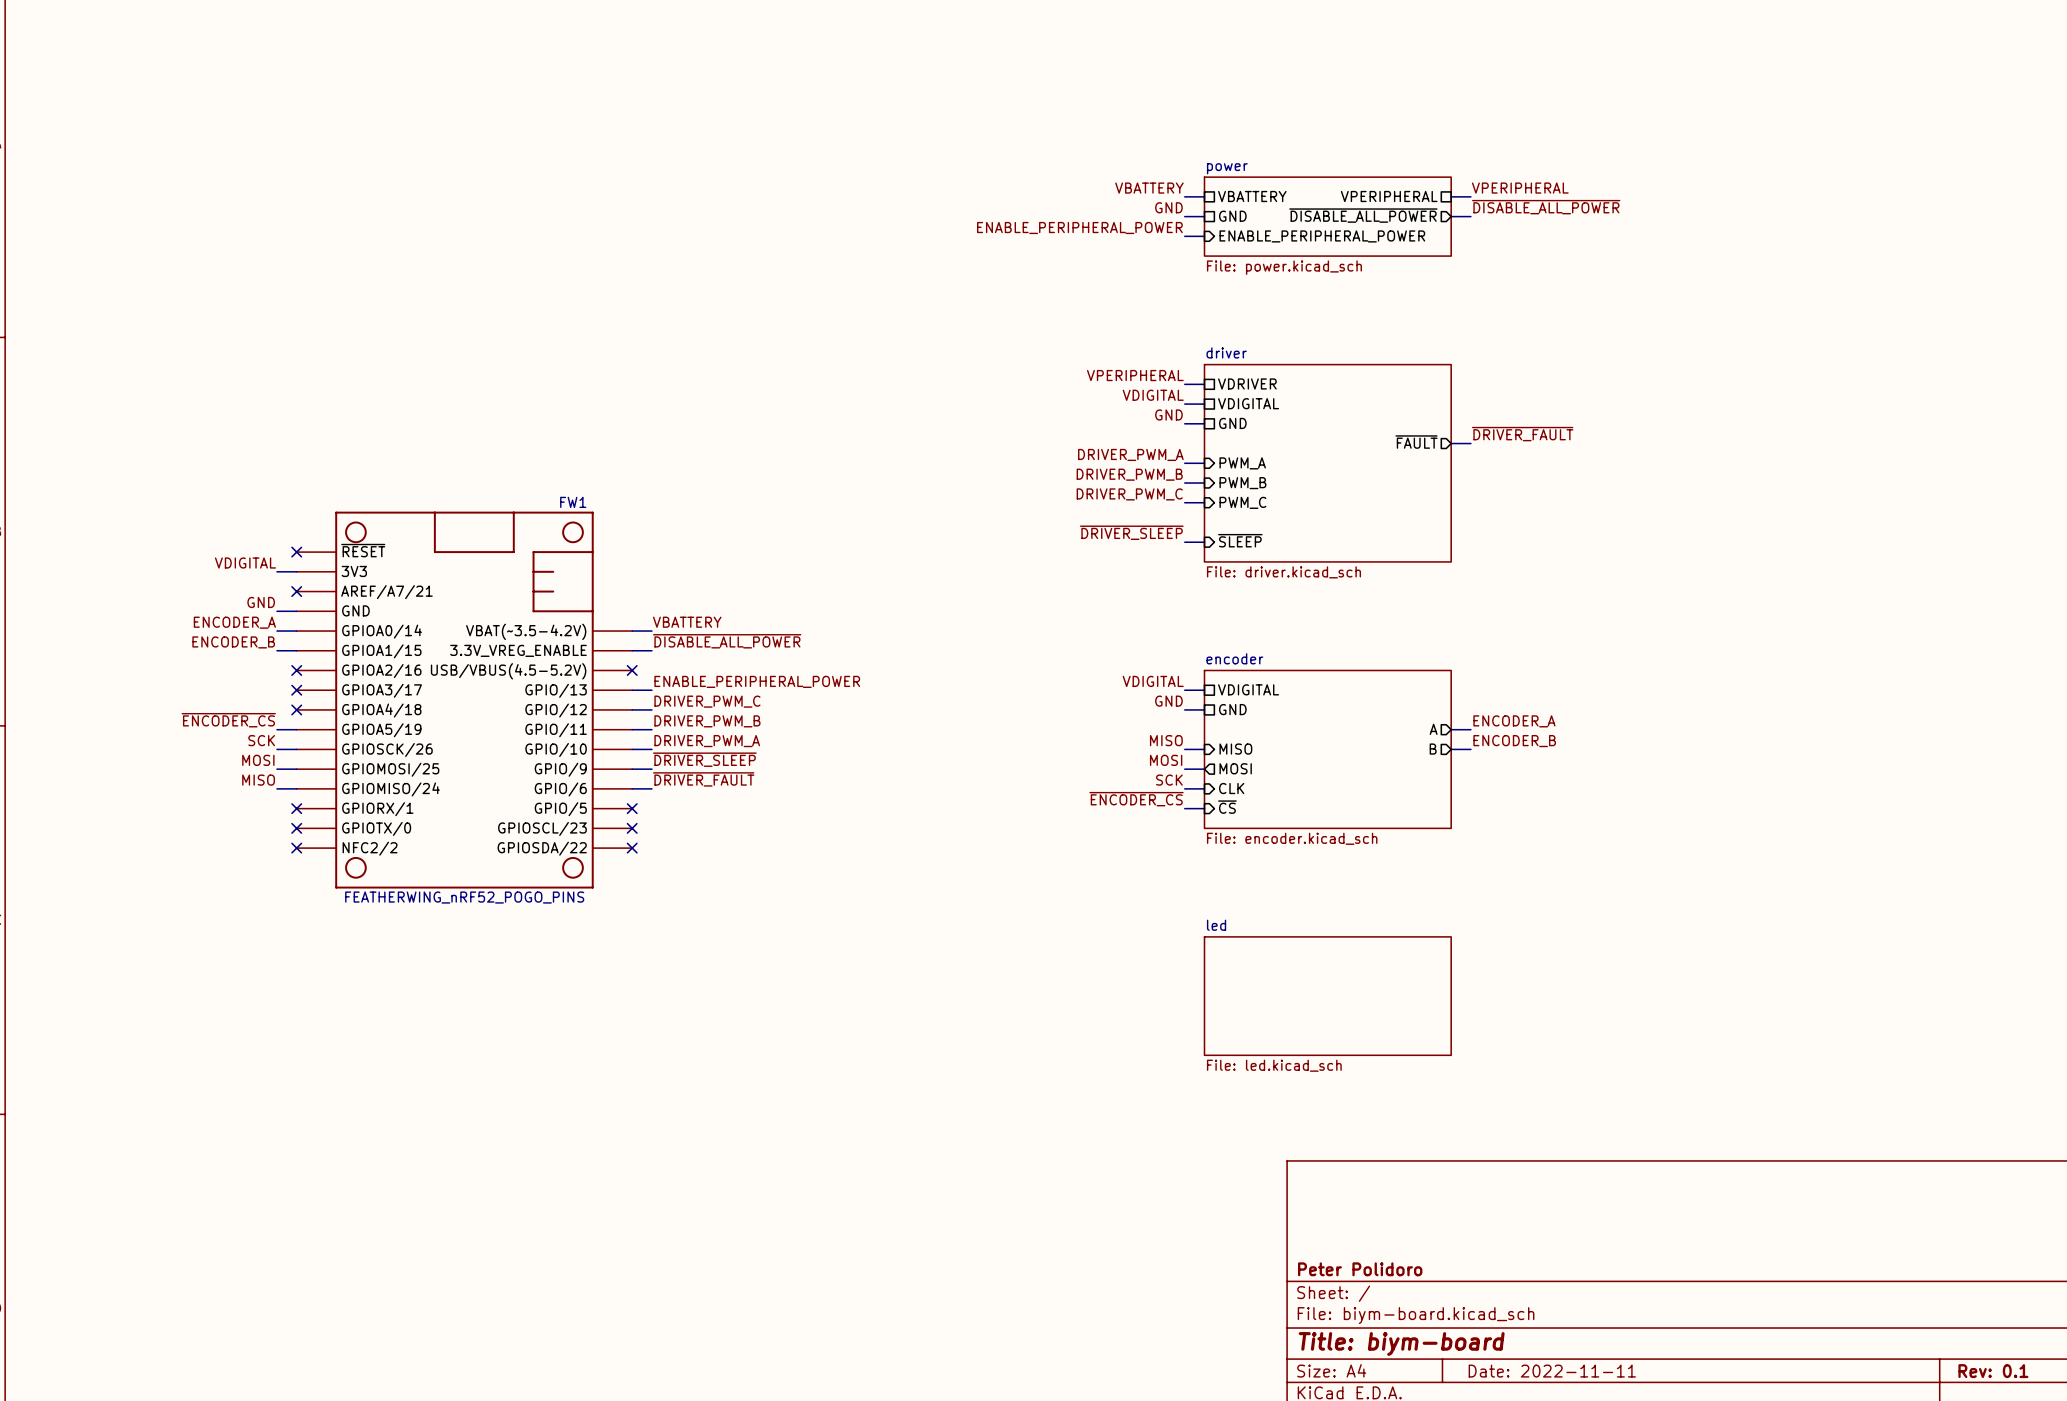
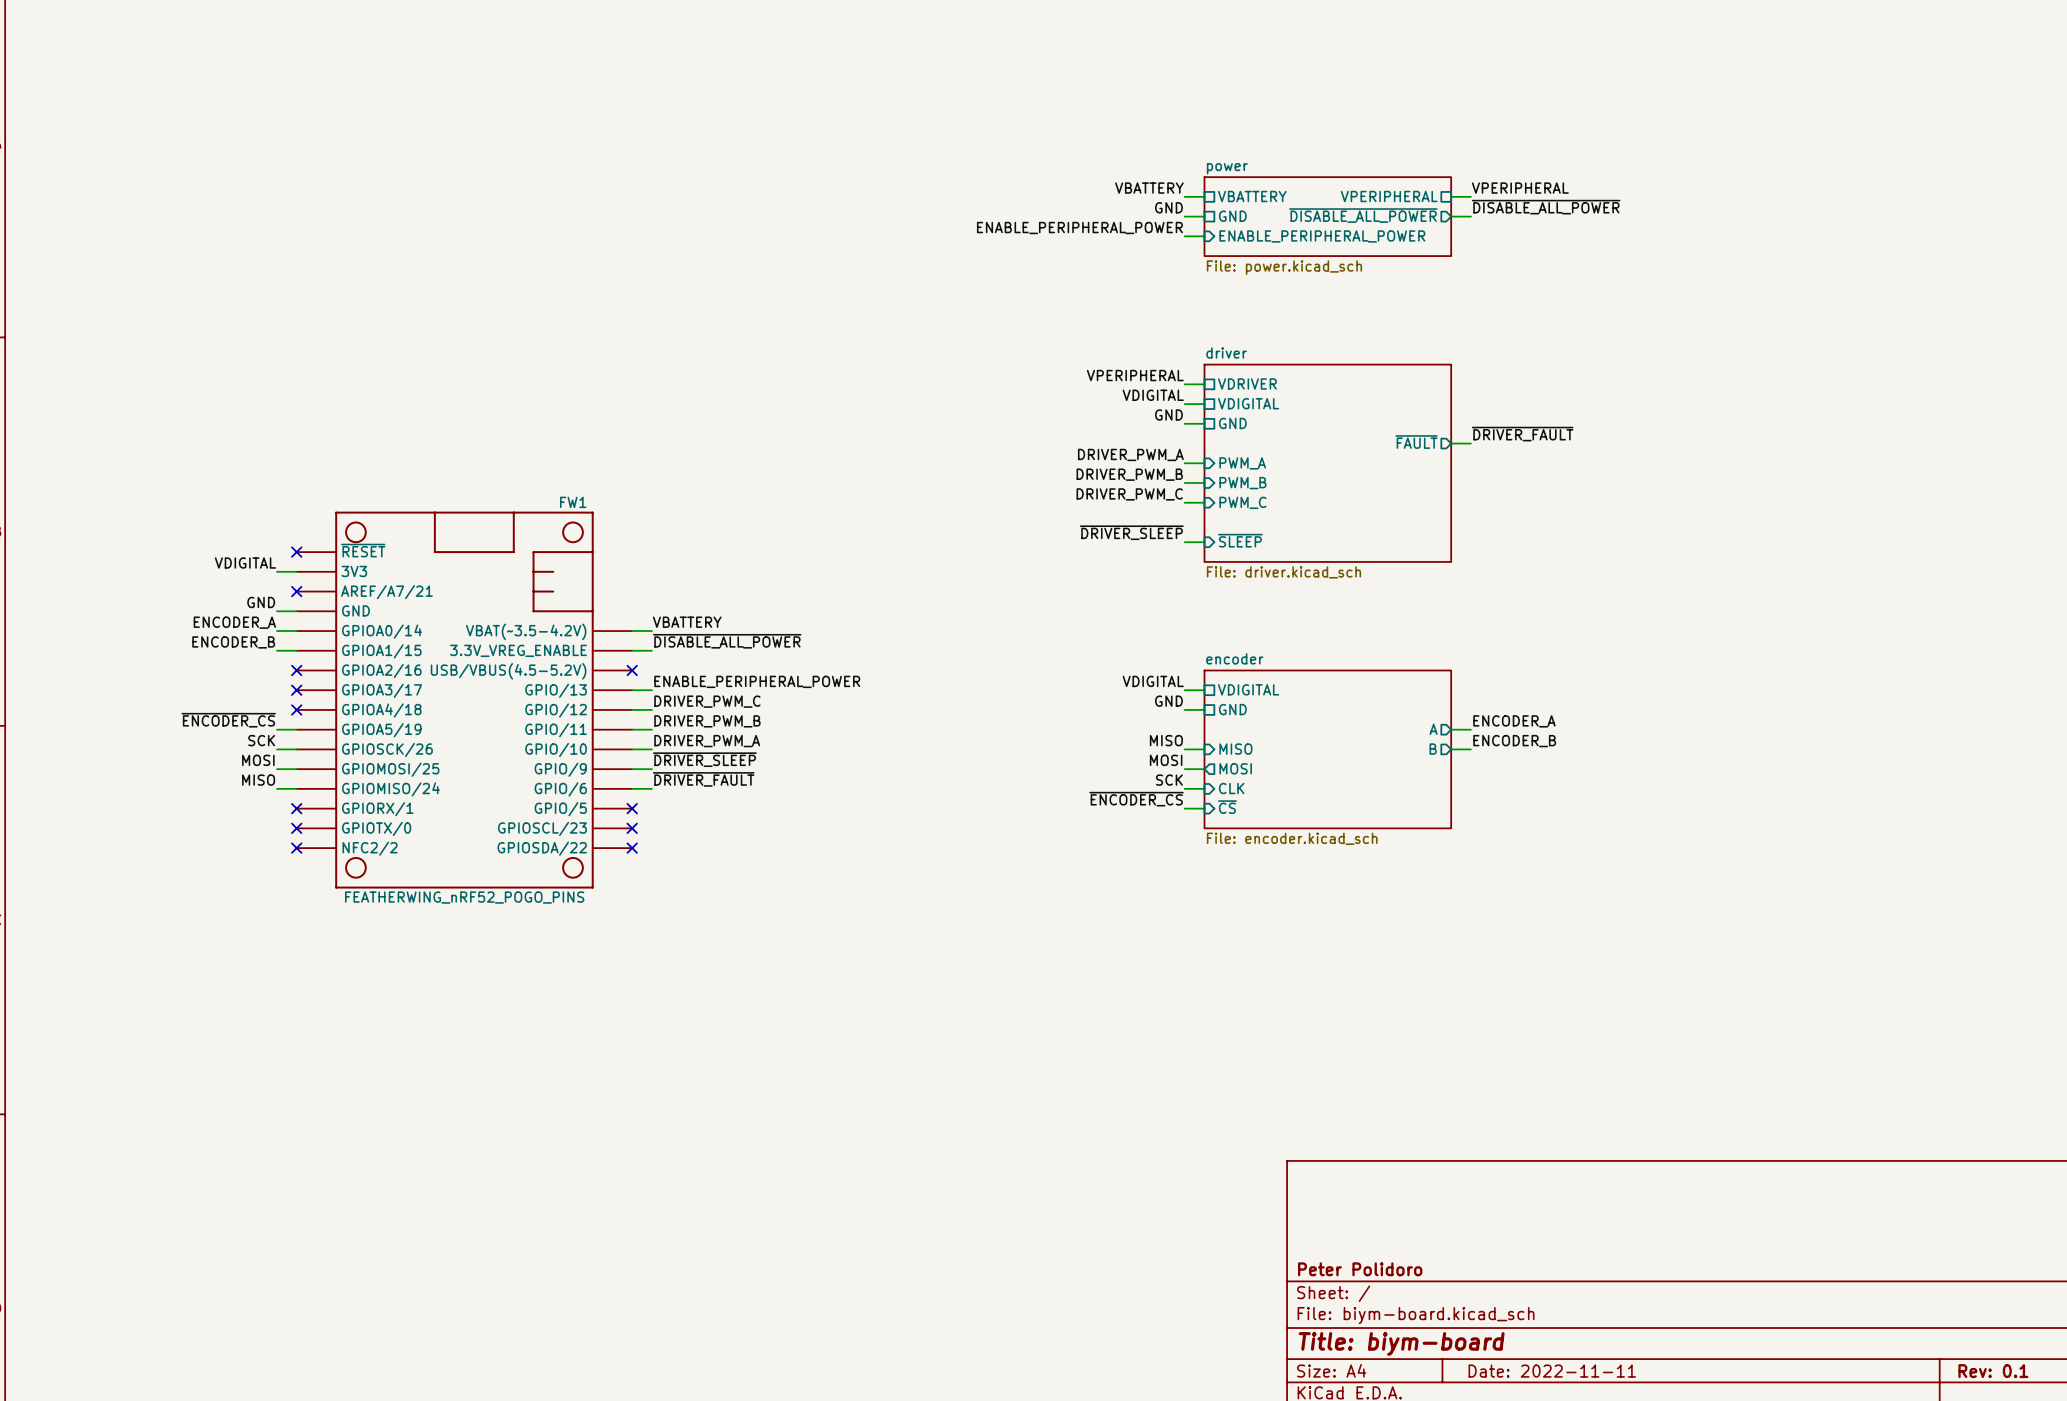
sheet led: File: led.kicad_sch (1327, 996) -> none

